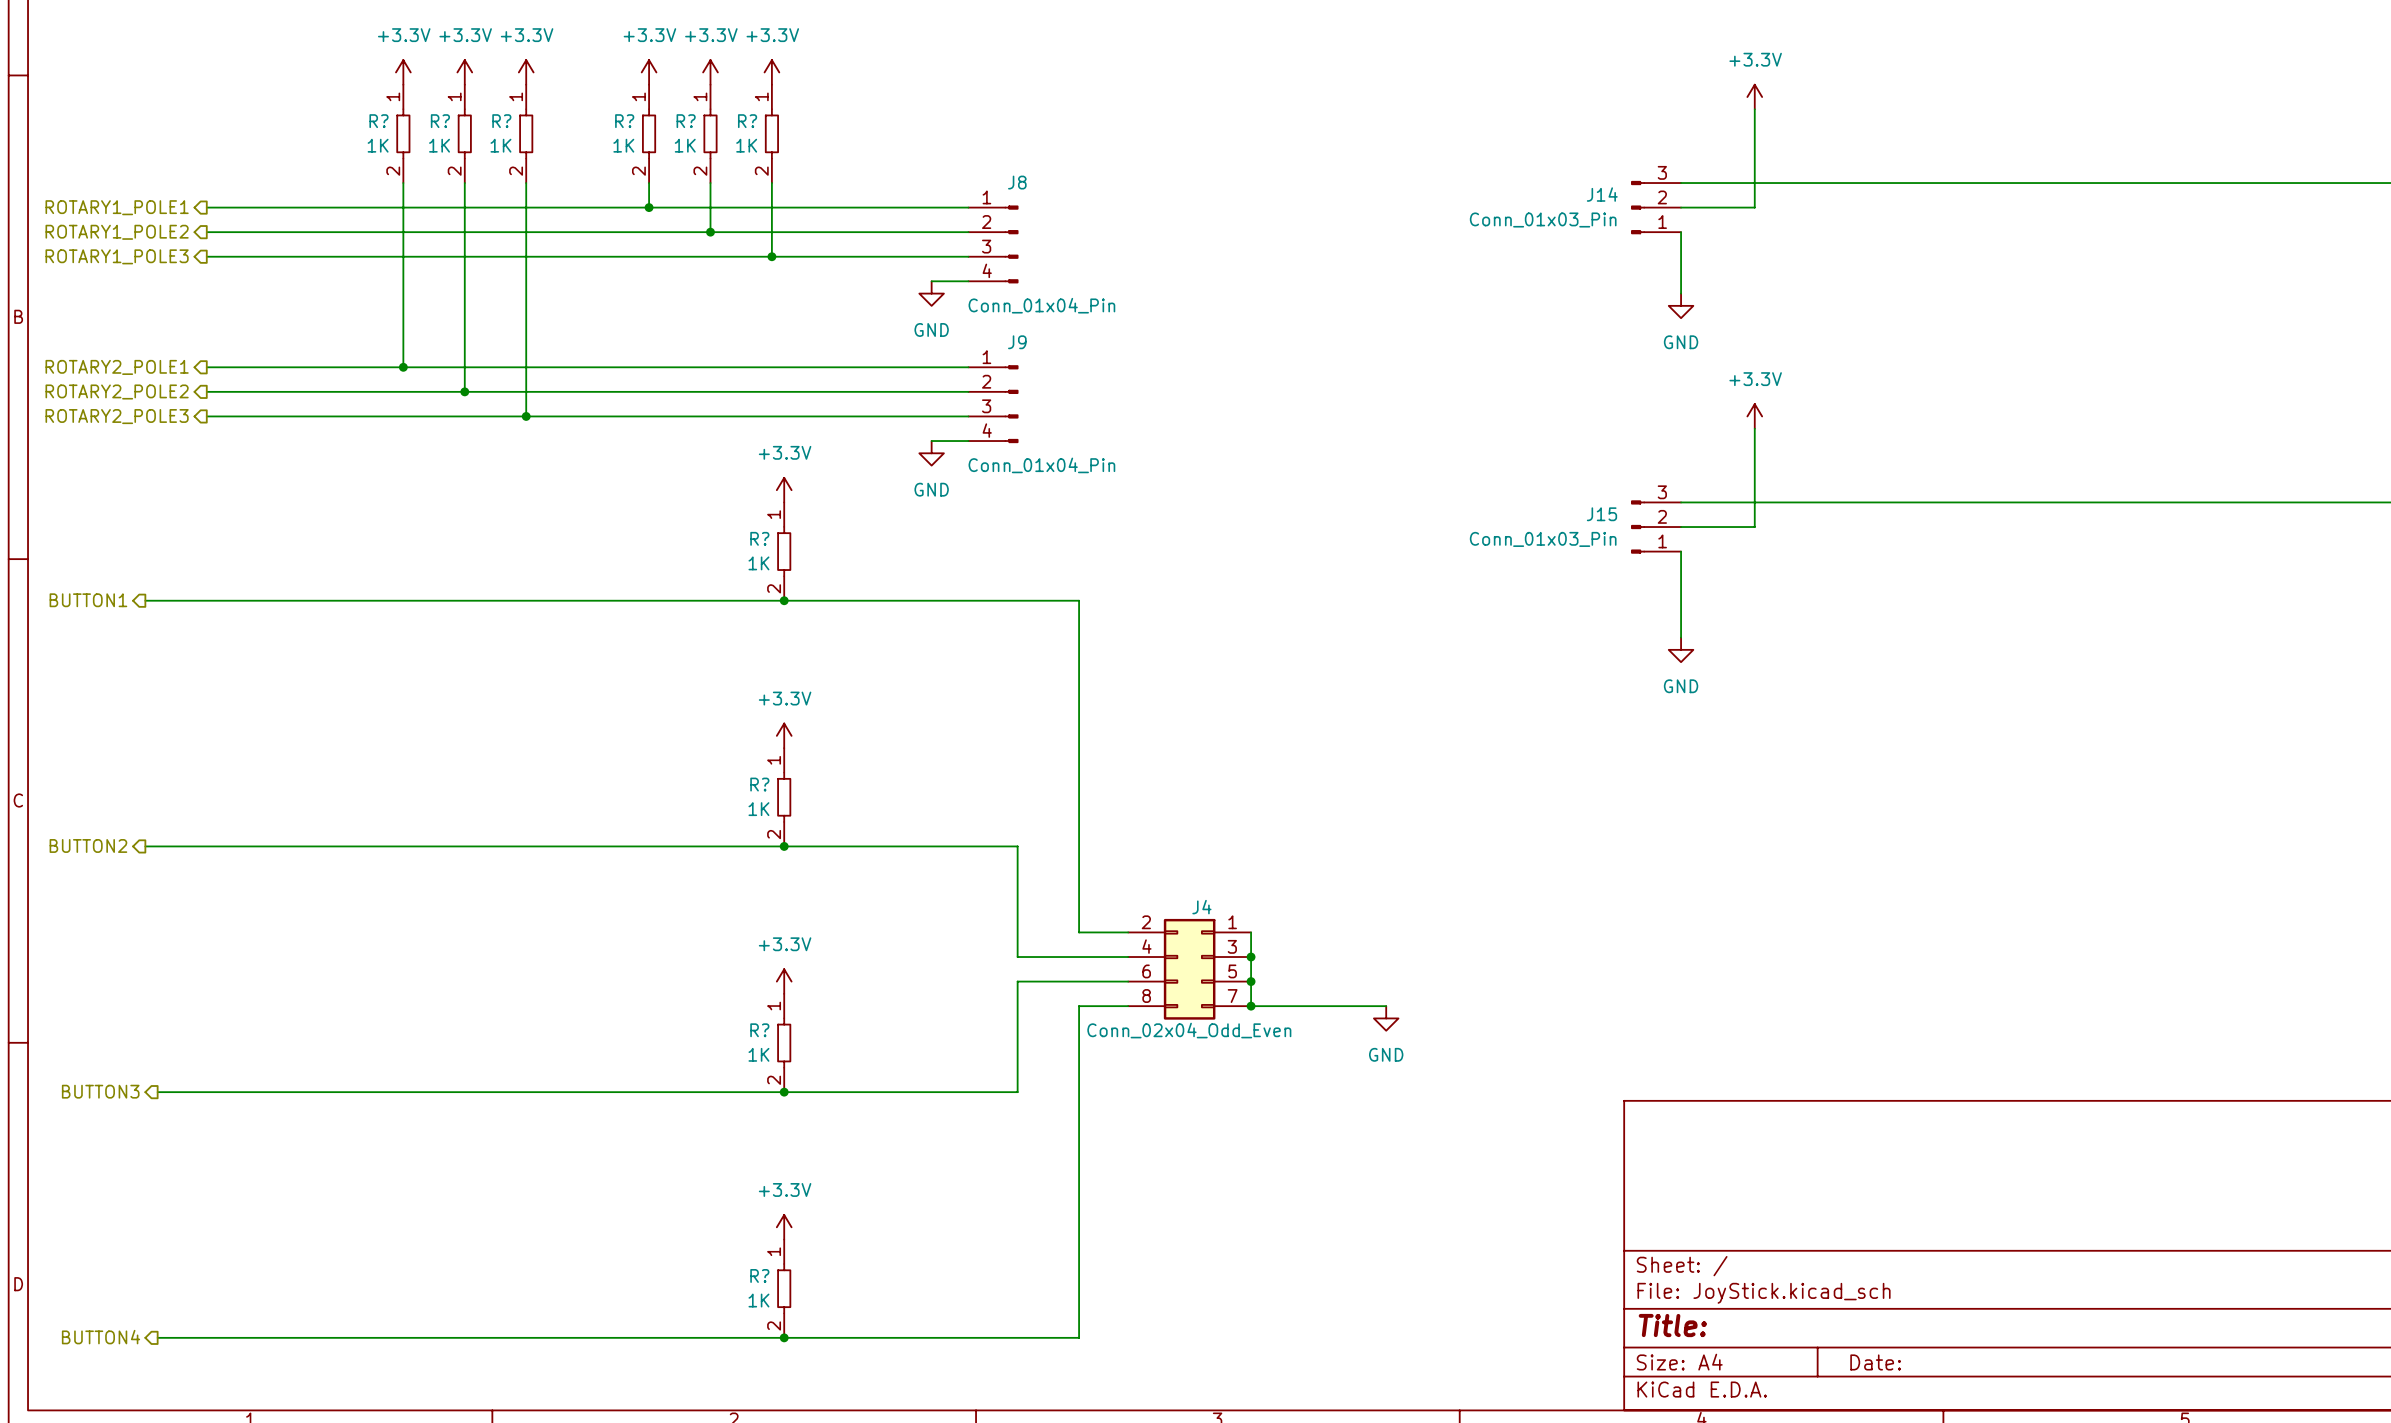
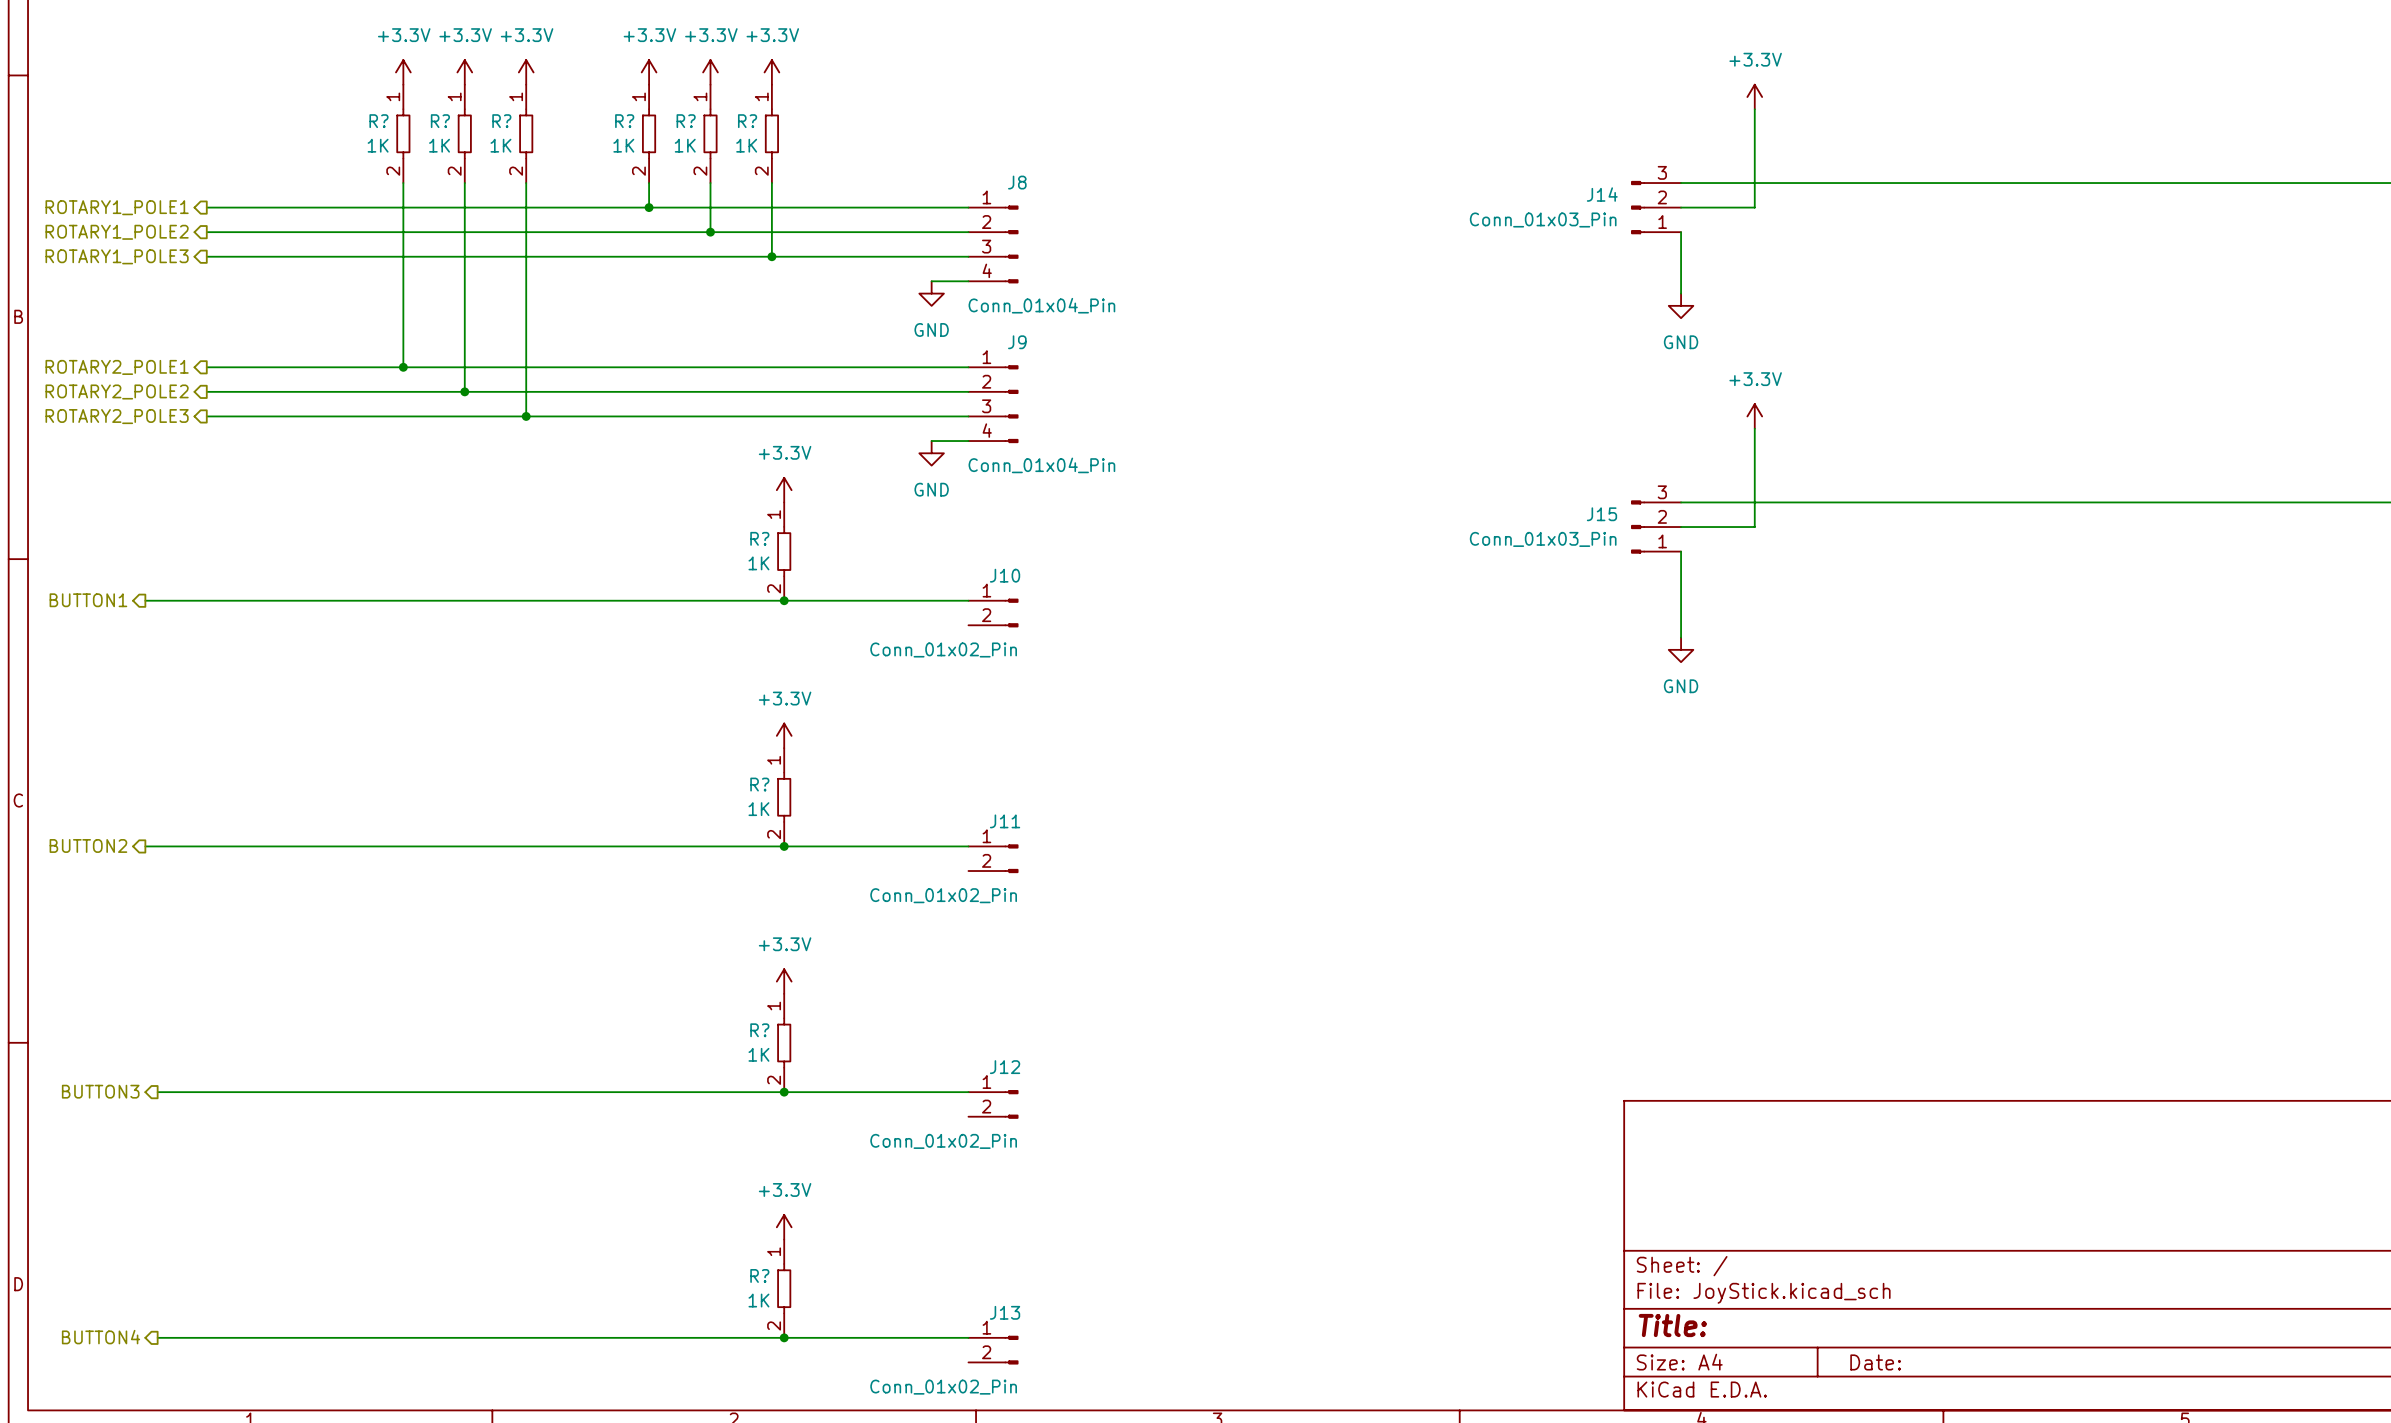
wire: (968, 600) (1079, 600) (1079, 932) (1128, 932) -> none
J10: none -> Conn_01x02_Pin (993, 613)
wire: (968, 846) (1017, 846) (1017, 957) (1128, 957) -> none
J11: none -> Conn_01x02_Pin (993, 858)
wire: (1251, 932) (1251, 1006) (1386, 1006) -> none
junction: (1251, 957) -> none
J4: Conn_02x04_Odd_Even (1189, 969) -> none
wire: (1128, 981) (1017, 981) (1017, 1092) (968, 1092) -> none
junction: (1251, 981) -> none
wire: (1128, 1006) (1079, 1006) (1079, 1337) (968, 1337) -> none
junction: (1251, 1006) -> none
power symbol: GND (1386, 1018) -> none
J12: none -> Conn_01x02_Pin (993, 1104)
J13: none -> Conn_01x02_Pin (993, 1350)

